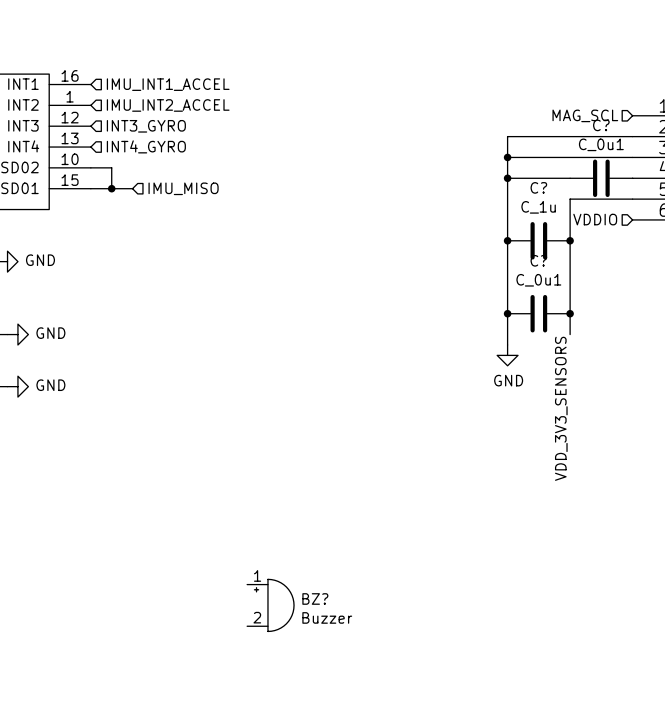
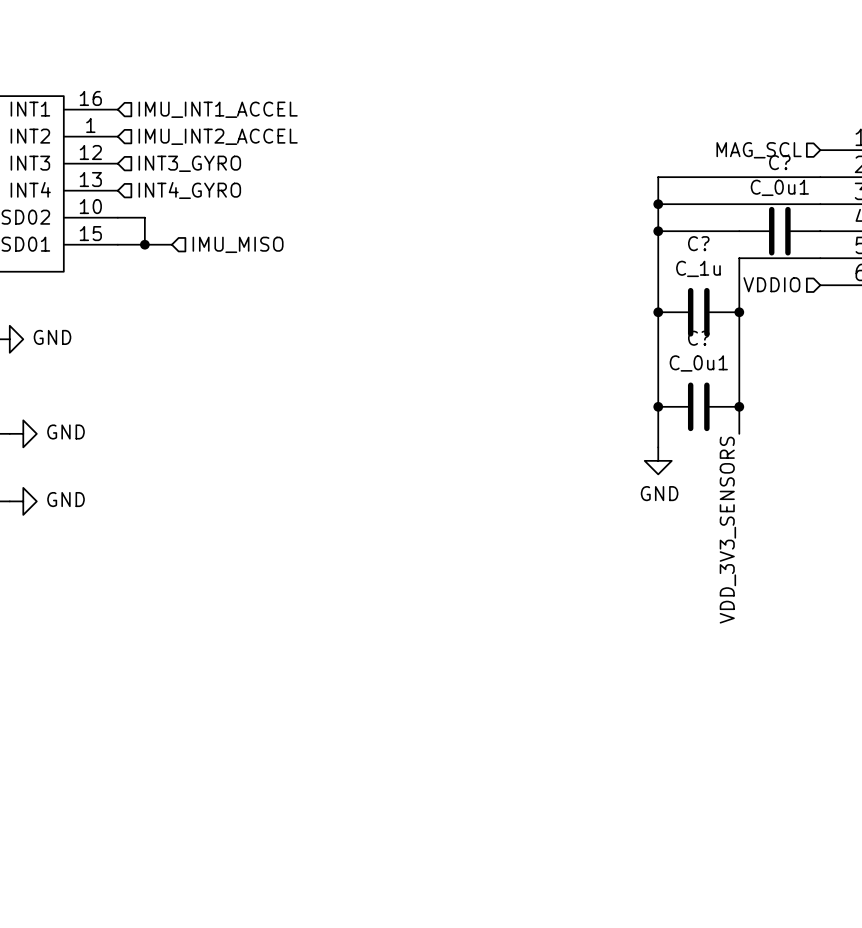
BZ?: Buzzer (270, 605) -> none

